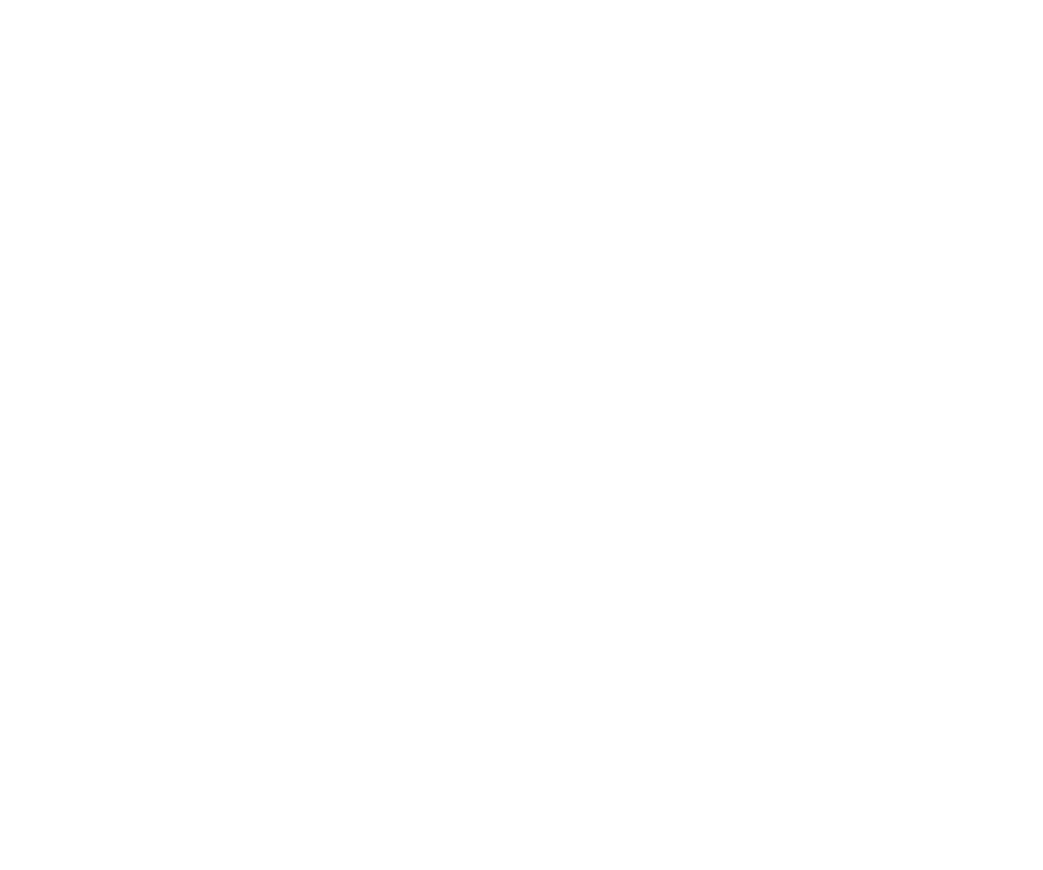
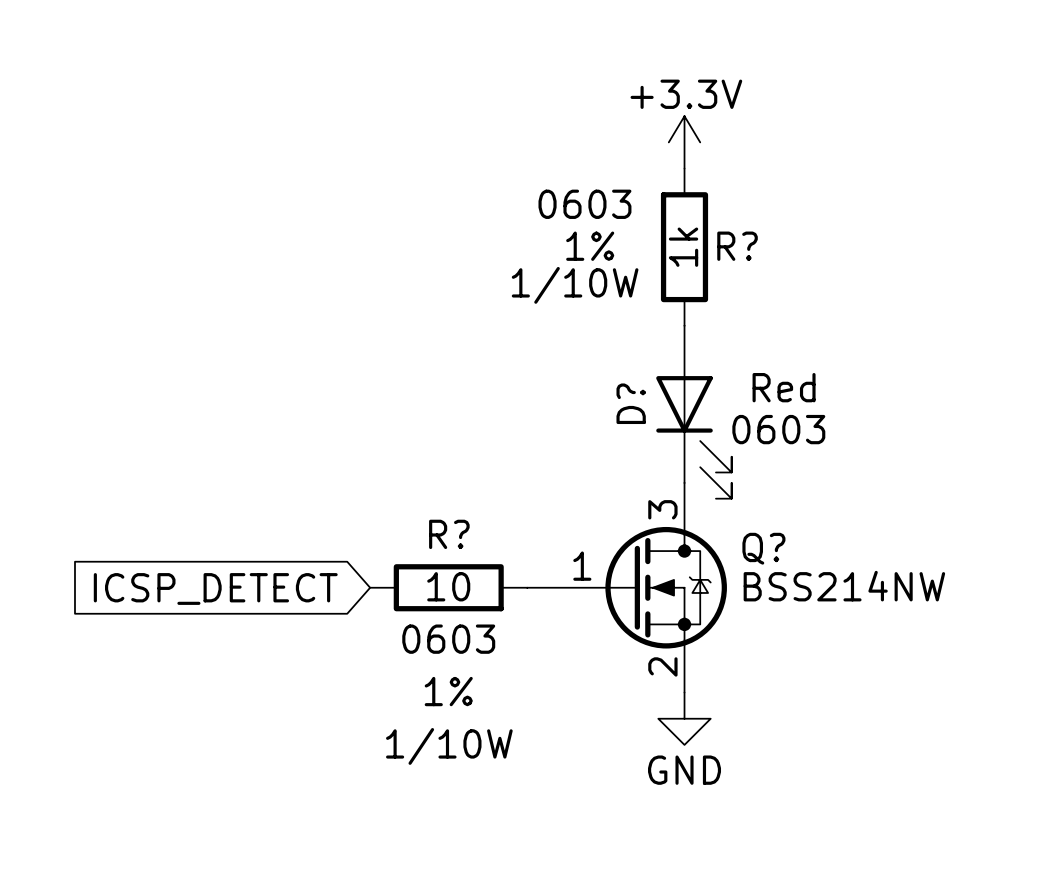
power symbol: none -> +3.3V (684, 142)
R?: none -> 1k (684, 247)
D?: none -> Red (693, 412)
R?: none -> 10 (448, 587)
Q?: none -> BSS214NW (627, 587)
global label: none -> ICSP_DETECT (215, 588)
power symbol: none -> GND (684, 718)

